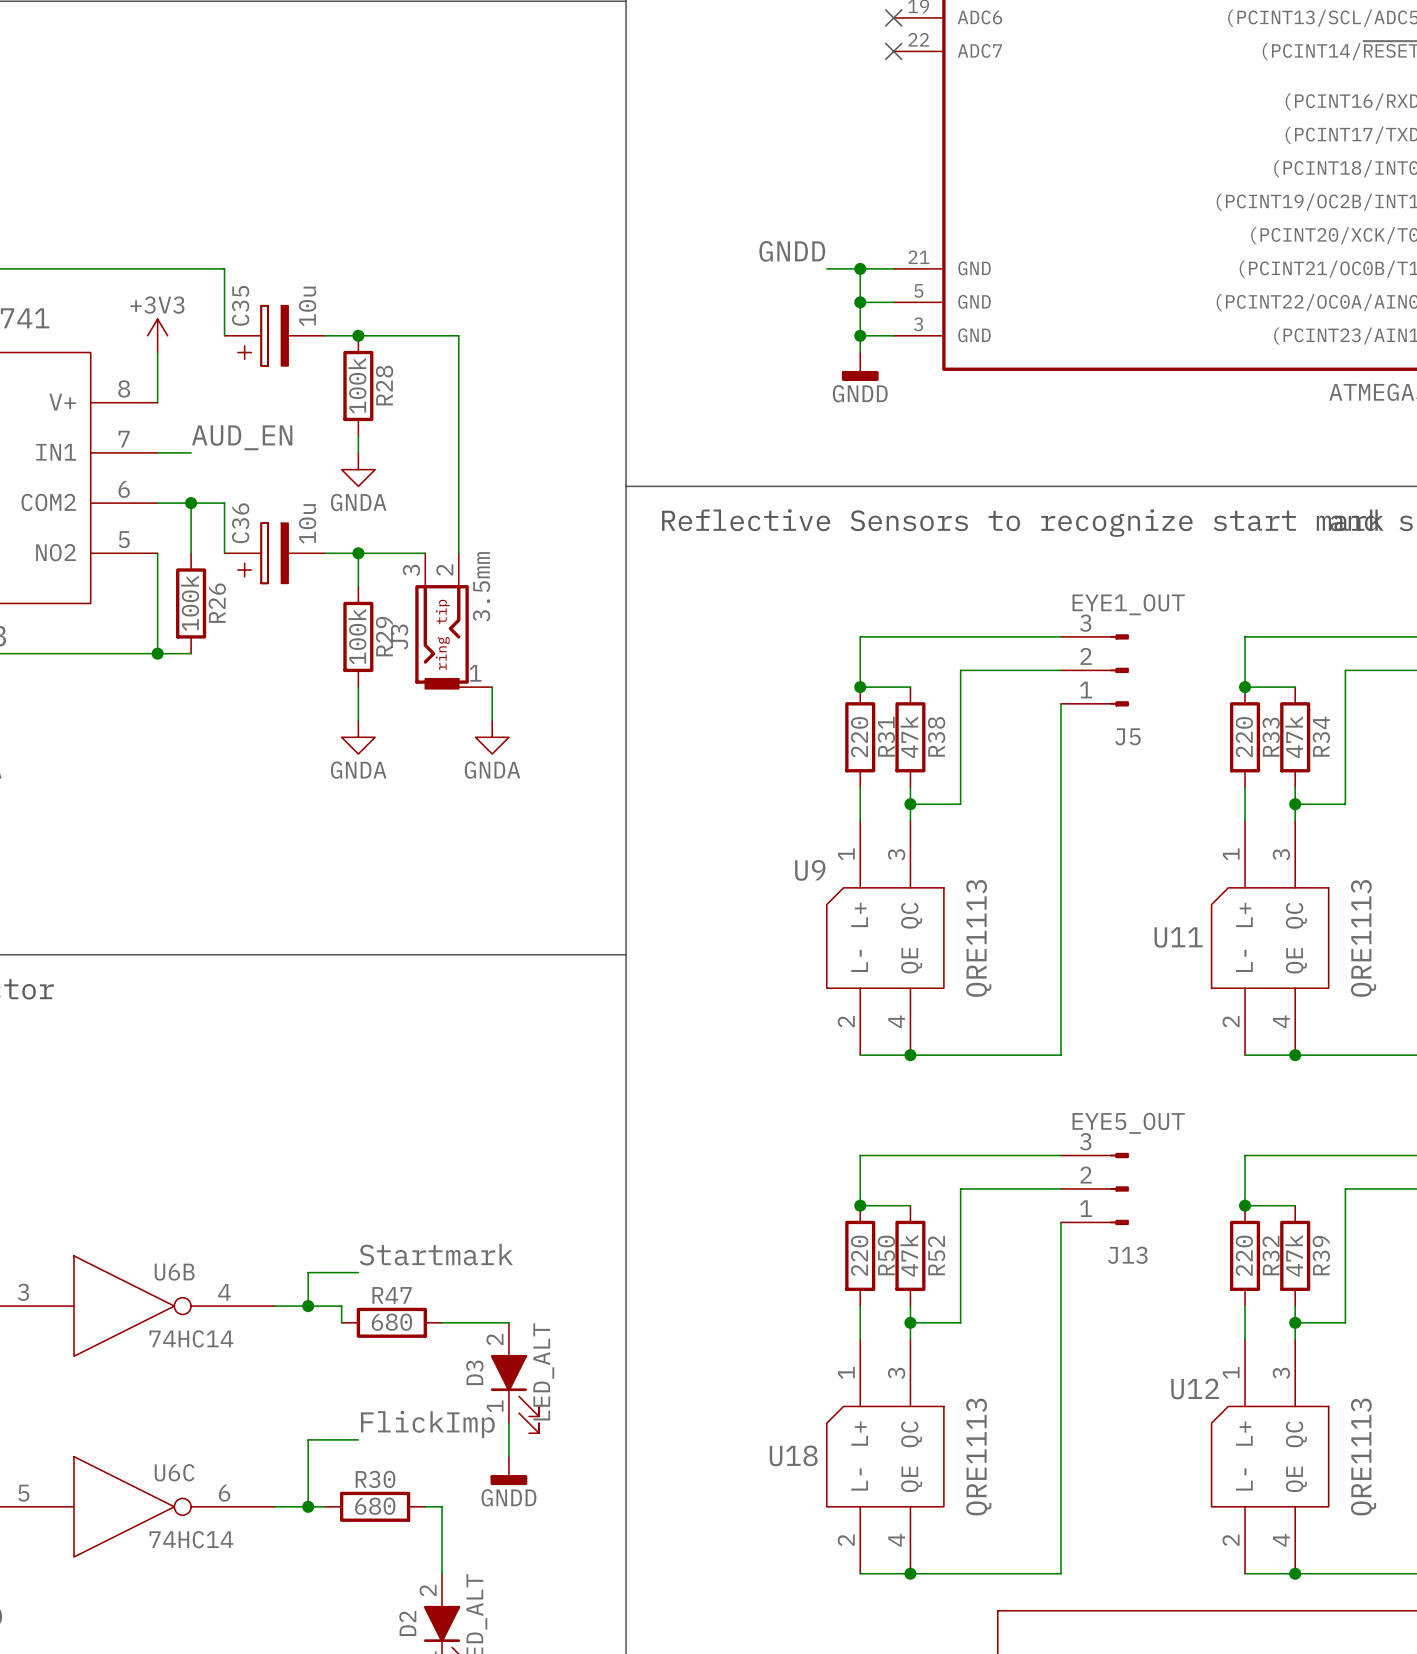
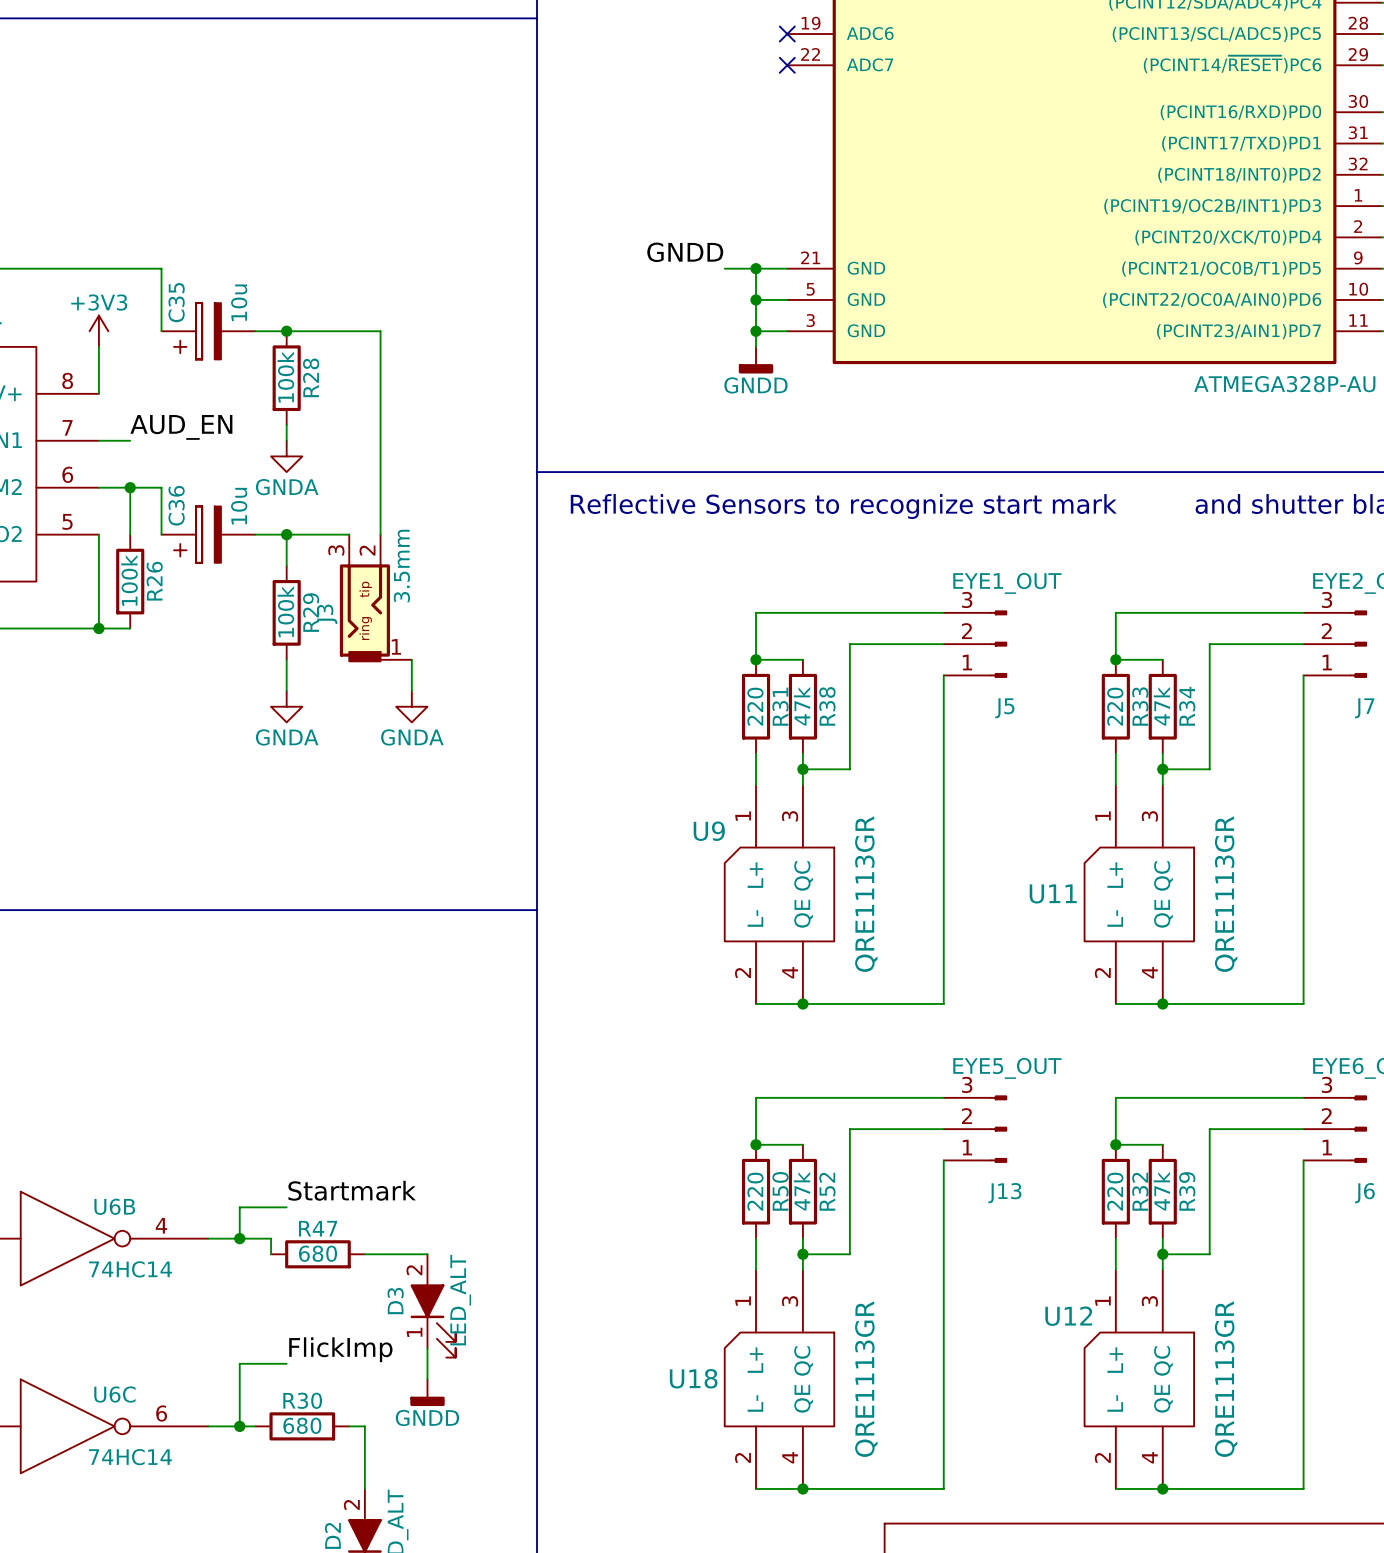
U9 value: QRE1113 (978, 938) -> QRE1113GR (866, 894)
U11 value: QRE1113 (1363, 938) -> QRE1113GR (1226, 894)
U18 value: QRE1113 (978, 1457) -> QRE1113GR (866, 1379)
U12 value: QRE1113 (1363, 1457) -> QRE1113GR (1226, 1379)

